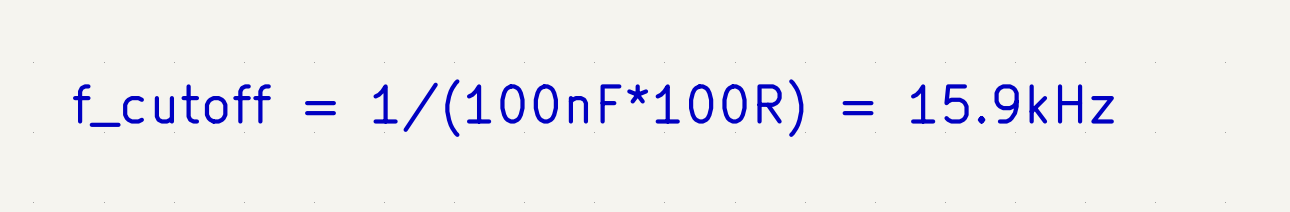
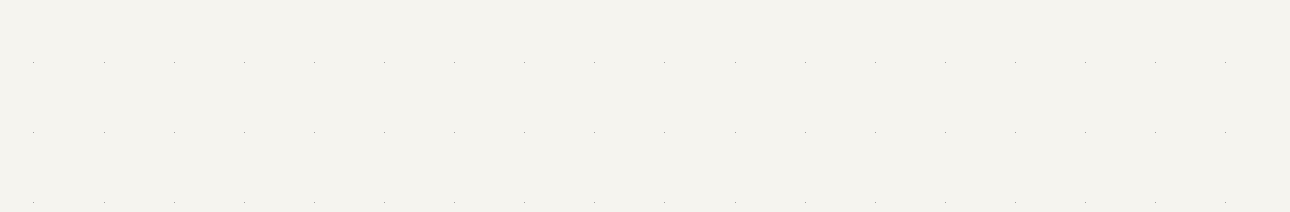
text: f_cutoff = 1/(100nF*100R) = 15.9kHz (593, 108) -> none

